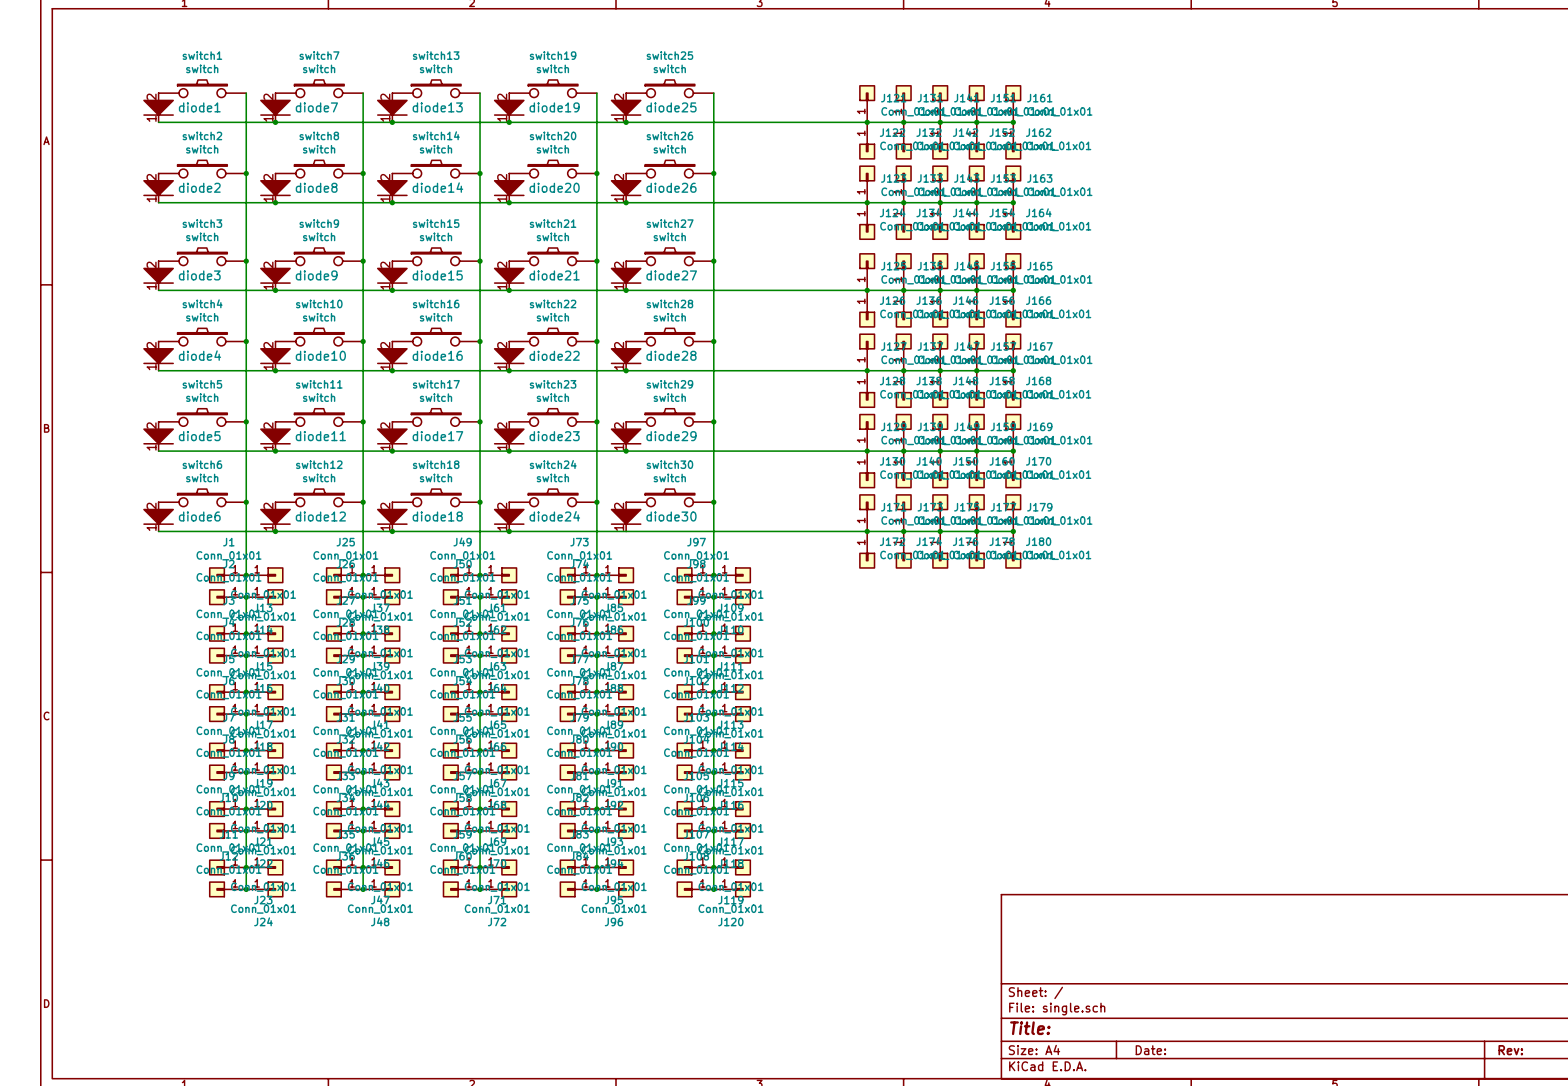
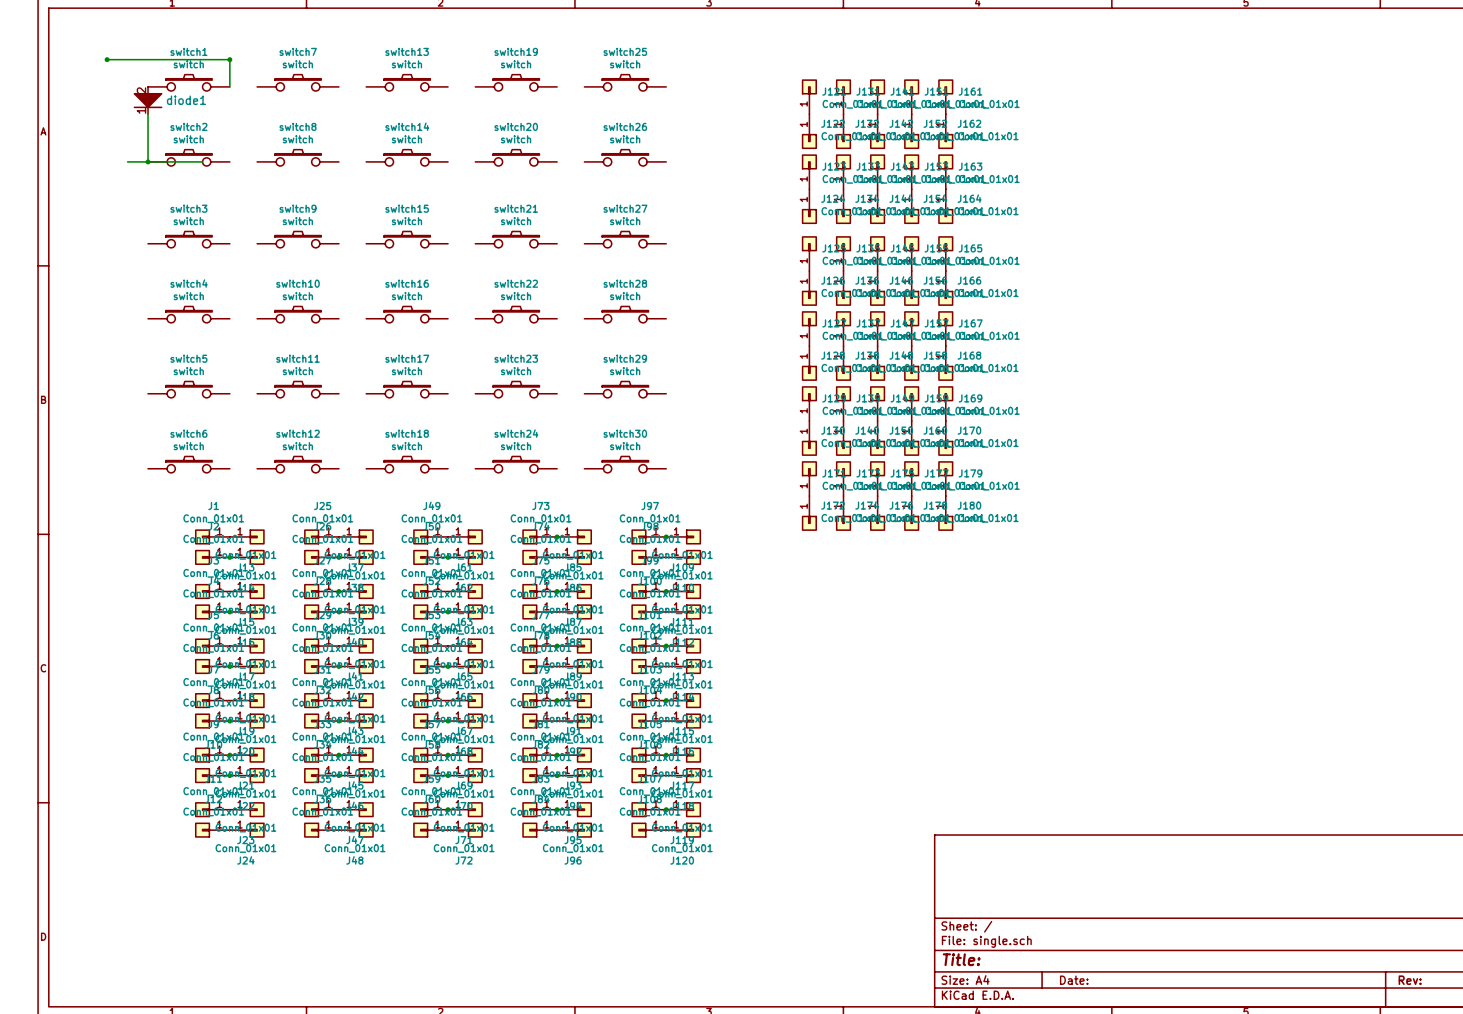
junction: none -> (107, 59)
junction: none -> (229, 59)
wire: (246, 93) (246, 889) -> (229, 86) (229, 59) (107, 59)
wire: (363, 93) (363, 889) -> none
wire: (480, 93) (480, 889) -> none
wire: (596, 93) (596, 889) -> none
wire: (713, 93) (713, 889) -> none
diode7: (275, 107) -> none
diode13: (392, 107) -> none
diode19: (509, 107) -> none
diode25: (626, 107) -> none
wire: (158, 122) (1013, 122) -> (148, 114) (148, 161)
junction: (275, 122) -> none
junction: (392, 122) -> none
junction: (509, 122) -> none
junction: (626, 122) -> none
junction: (867, 122) -> none
junction: (903, 122) -> none
junction: (940, 122) -> none
junction: (976, 122) -> none
junction: (1013, 122) -> none
wire: none -> (127, 161) (202, 161)
junction: none -> (148, 161)
junction: (246, 173) -> none
junction: (363, 173) -> none
junction: (480, 173) -> none
junction: (596, 173) -> none
junction: (713, 173) -> none
diode2: (158, 188) -> none
diode8: (275, 188) -> none
diode14: (392, 188) -> none
diode20: (509, 188) -> none
diode26: (626, 188) -> none
wire: (158, 202) (1013, 202) -> none
junction: (275, 202) -> none
junction: (392, 202) -> none
junction: (509, 202) -> none
junction: (626, 202) -> none
junction: (867, 202) -> none
junction: (903, 202) -> none
junction: (940, 202) -> none
junction: (976, 202) -> none
junction: (1013, 202) -> none
junction: (246, 261) -> none
junction: (363, 261) -> none
junction: (480, 261) -> none
junction: (596, 261) -> none
junction: (713, 261) -> none
diode3: (158, 275) -> none
diode9: (275, 275) -> none
diode15: (392, 275) -> none
diode21: (509, 275) -> none
diode27: (626, 275) -> none
wire: (158, 290) (1013, 290) -> none
junction: (275, 290) -> none
junction: (392, 290) -> none
junction: (509, 290) -> none
junction: (626, 290) -> none
junction: (867, 290) -> none
junction: (903, 290) -> none
junction: (940, 290) -> none
junction: (976, 290) -> none
junction: (1013, 290) -> none
junction: (246, 341) -> none
junction: (363, 341) -> none
junction: (480, 341) -> none
junction: (596, 341) -> none
junction: (713, 341) -> none
diode4: (158, 356) -> none
diode10: (275, 356) -> none
diode16: (392, 356) -> none
diode22: (509, 356) -> none
diode28: (626, 356) -> none
wire: (158, 370) (1013, 370) -> none
junction: (275, 370) -> none
junction: (392, 370) -> none
junction: (509, 370) -> none
junction: (626, 370) -> none
junction: (867, 370) -> none
junction: (903, 370) -> none
junction: (940, 370) -> none
junction: (976, 370) -> none
junction: (1013, 370) -> none
junction: (246, 421) -> none
junction: (363, 421) -> none
junction: (480, 421) -> none
junction: (596, 421) -> none
junction: (713, 421) -> none
diode5: (158, 436) -> none
diode11: (275, 436) -> none
diode17: (392, 436) -> none
diode23: (509, 436) -> none
diode29: (626, 436) -> none
wire: (158, 451) (1013, 451) -> none
junction: (275, 451) -> none
junction: (392, 451) -> none
junction: (509, 451) -> none
junction: (626, 451) -> none
junction: (867, 451) -> none
junction: (903, 451) -> none
junction: (940, 451) -> none
junction: (976, 451) -> none
junction: (1013, 451) -> none
junction: (246, 502) -> none
junction: (363, 502) -> none
junction: (480, 502) -> none
junction: (596, 502) -> none
junction: (713, 502) -> none
diode6: (158, 516) -> none
diode12: (275, 516) -> none
diode18: (392, 516) -> none
diode24: (509, 516) -> none
diode30: (626, 516) -> none
wire: (158, 531) (1013, 531) -> none
junction: (275, 531) -> none
junction: (392, 531) -> none
junction: (509, 531) -> none
junction: (867, 531) -> none
junction: (903, 531) -> none
junction: (940, 531) -> none
junction: (976, 531) -> none
junction: (1013, 531) -> none
junction: (246, 575) -> none
junction: (363, 575) -> none
junction: (480, 575) -> none
junction: (596, 597) -> none
junction: (713, 597) -> none
junction: (246, 633) -> none
junction: (480, 633) -> none
junction: (596, 655) -> none
junction: (713, 655) -> none
junction: (246, 692) -> none
junction: (363, 692) -> none
junction: (480, 692) -> none
junction: (596, 714) -> none
junction: (713, 714) -> none
junction: (246, 750) -> none
junction: (363, 750) -> none
junction: (480, 750) -> none
junction: (596, 772) -> none
junction: (713, 772) -> none
junction: (713, 830) -> none
junction: (246, 867) -> none
junction: (363, 867) -> none
junction: (246, 889) -> none
junction: (363, 889) -> none
junction: (480, 889) -> none
junction: (596, 889) -> none
junction: (713, 889) -> none

